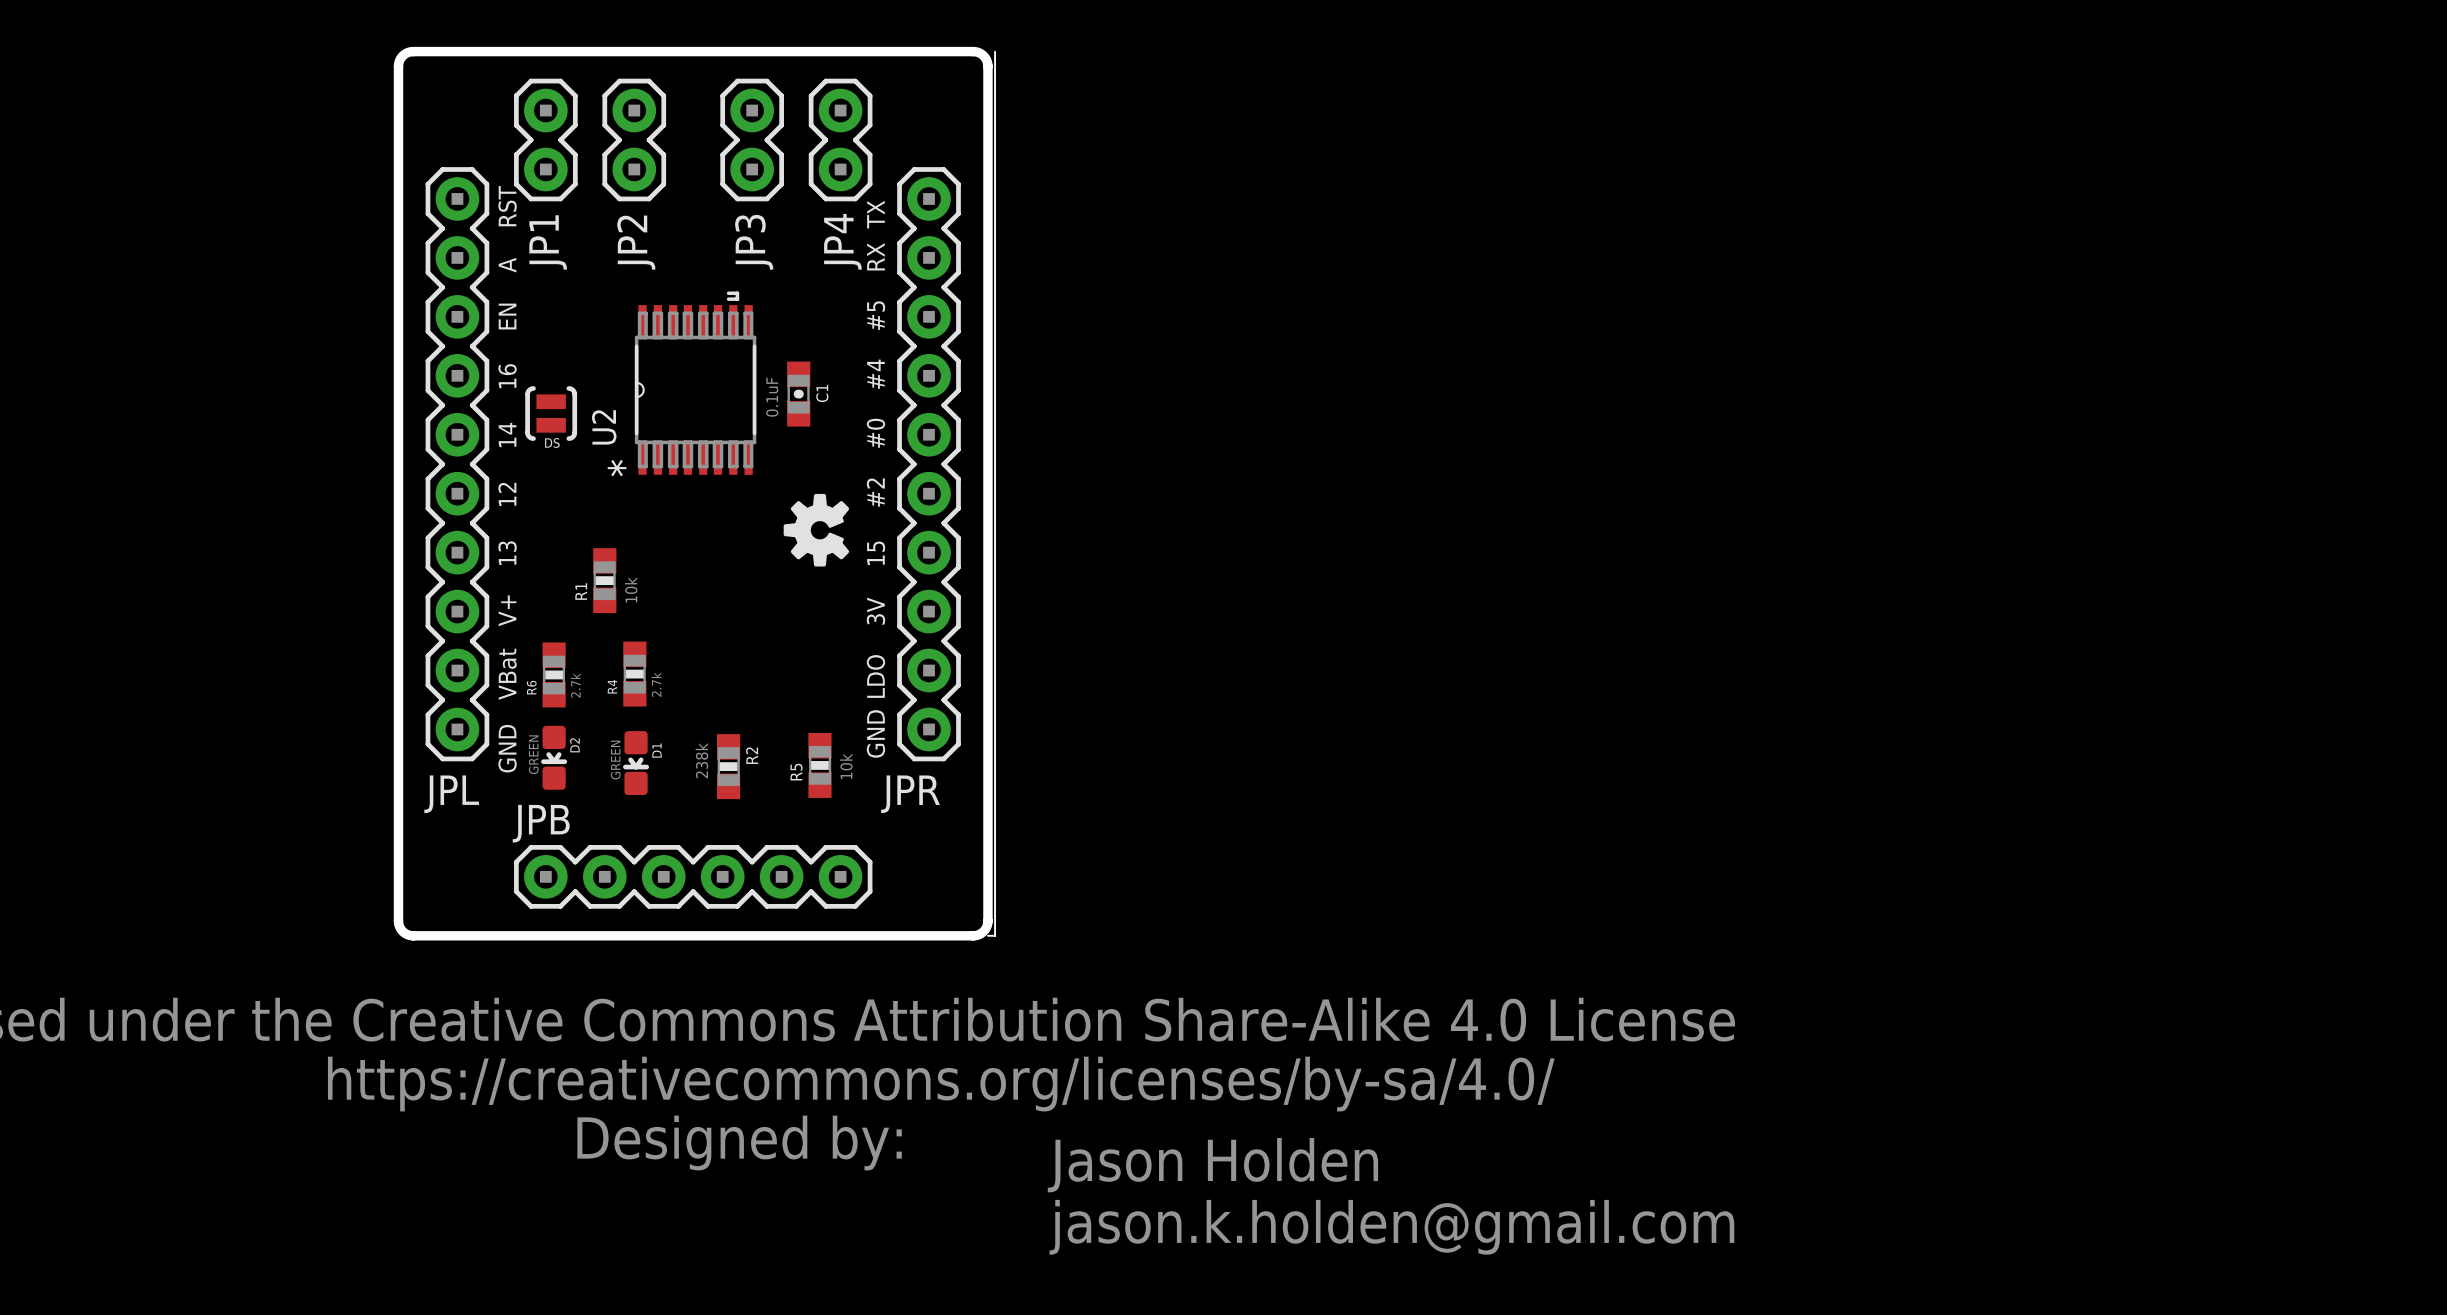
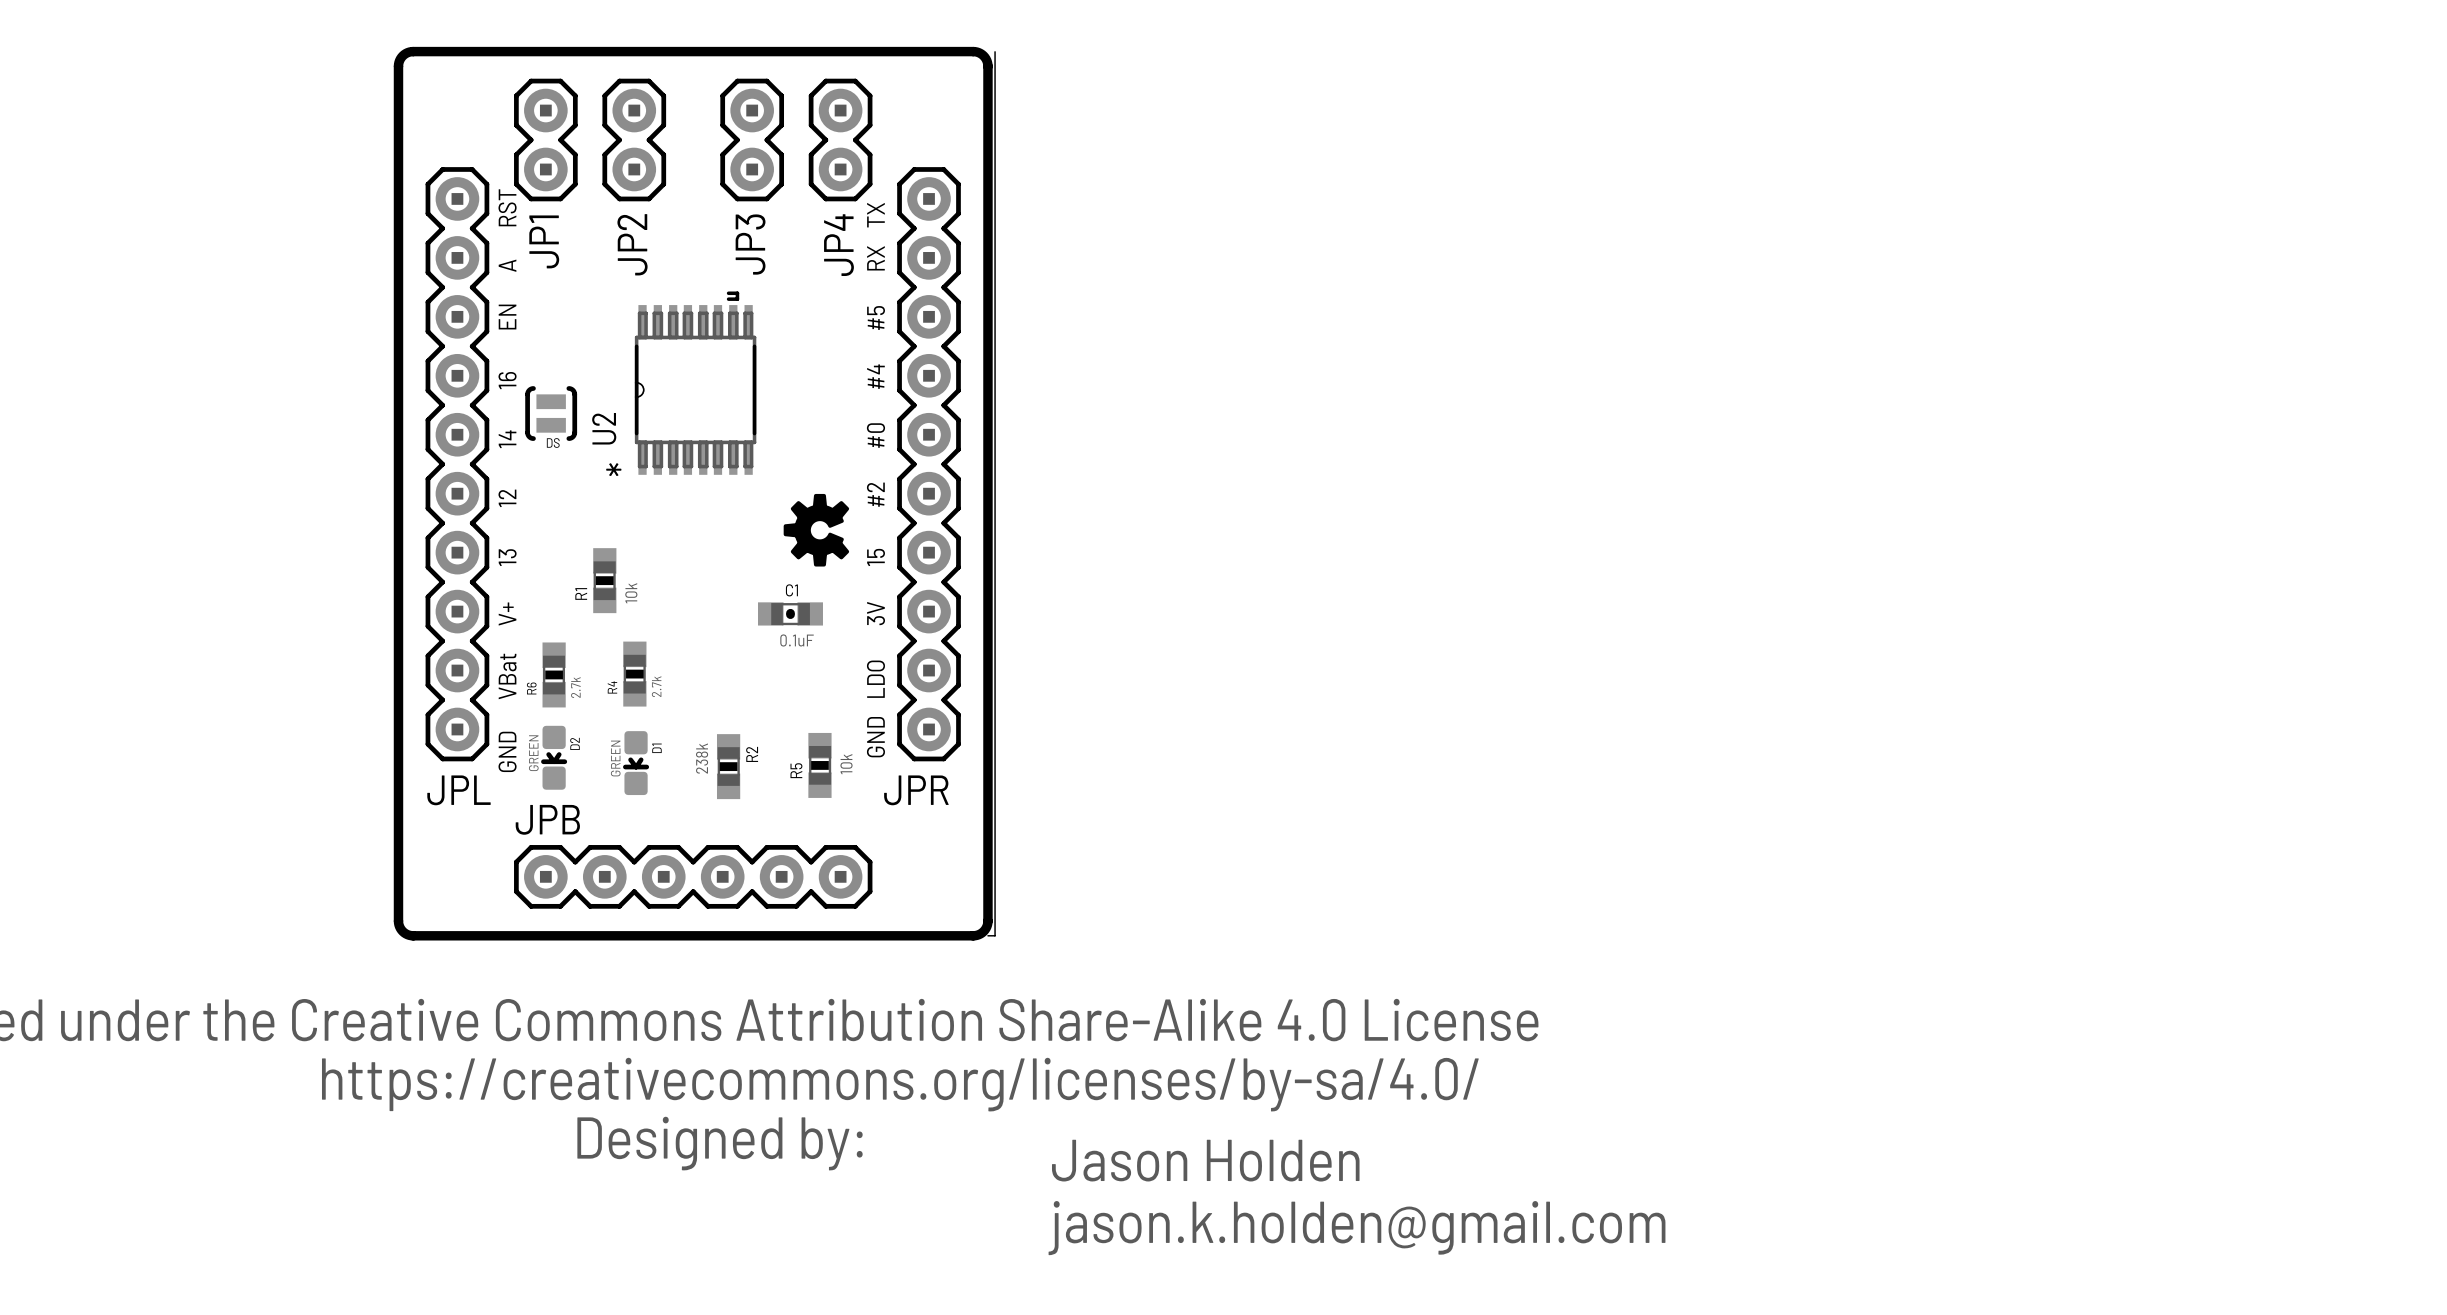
C1 rotation: 0° (798, 394) -> 90° clockwise (790, 613)
C1 position: (798, 394) -> (790, 613)

